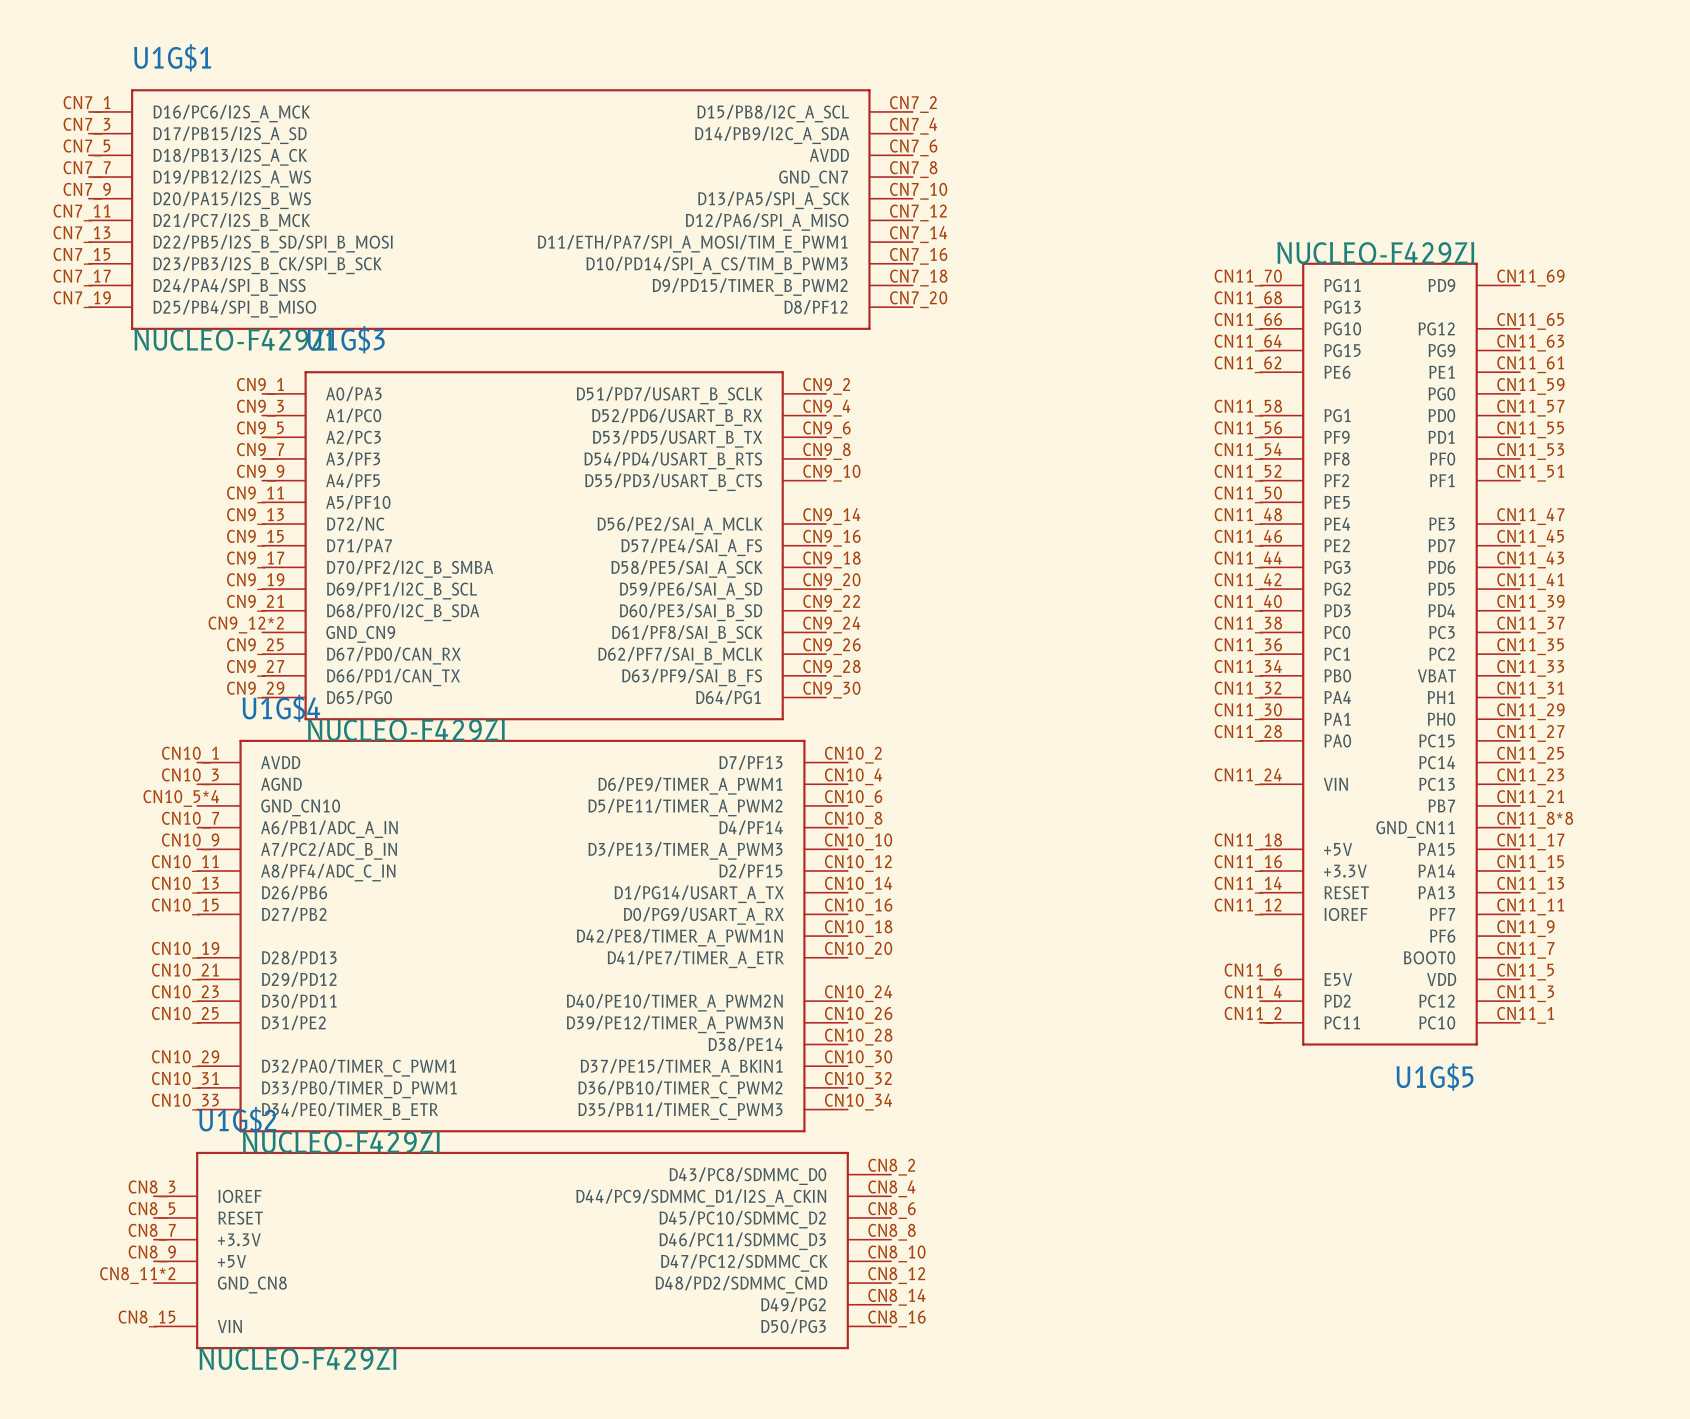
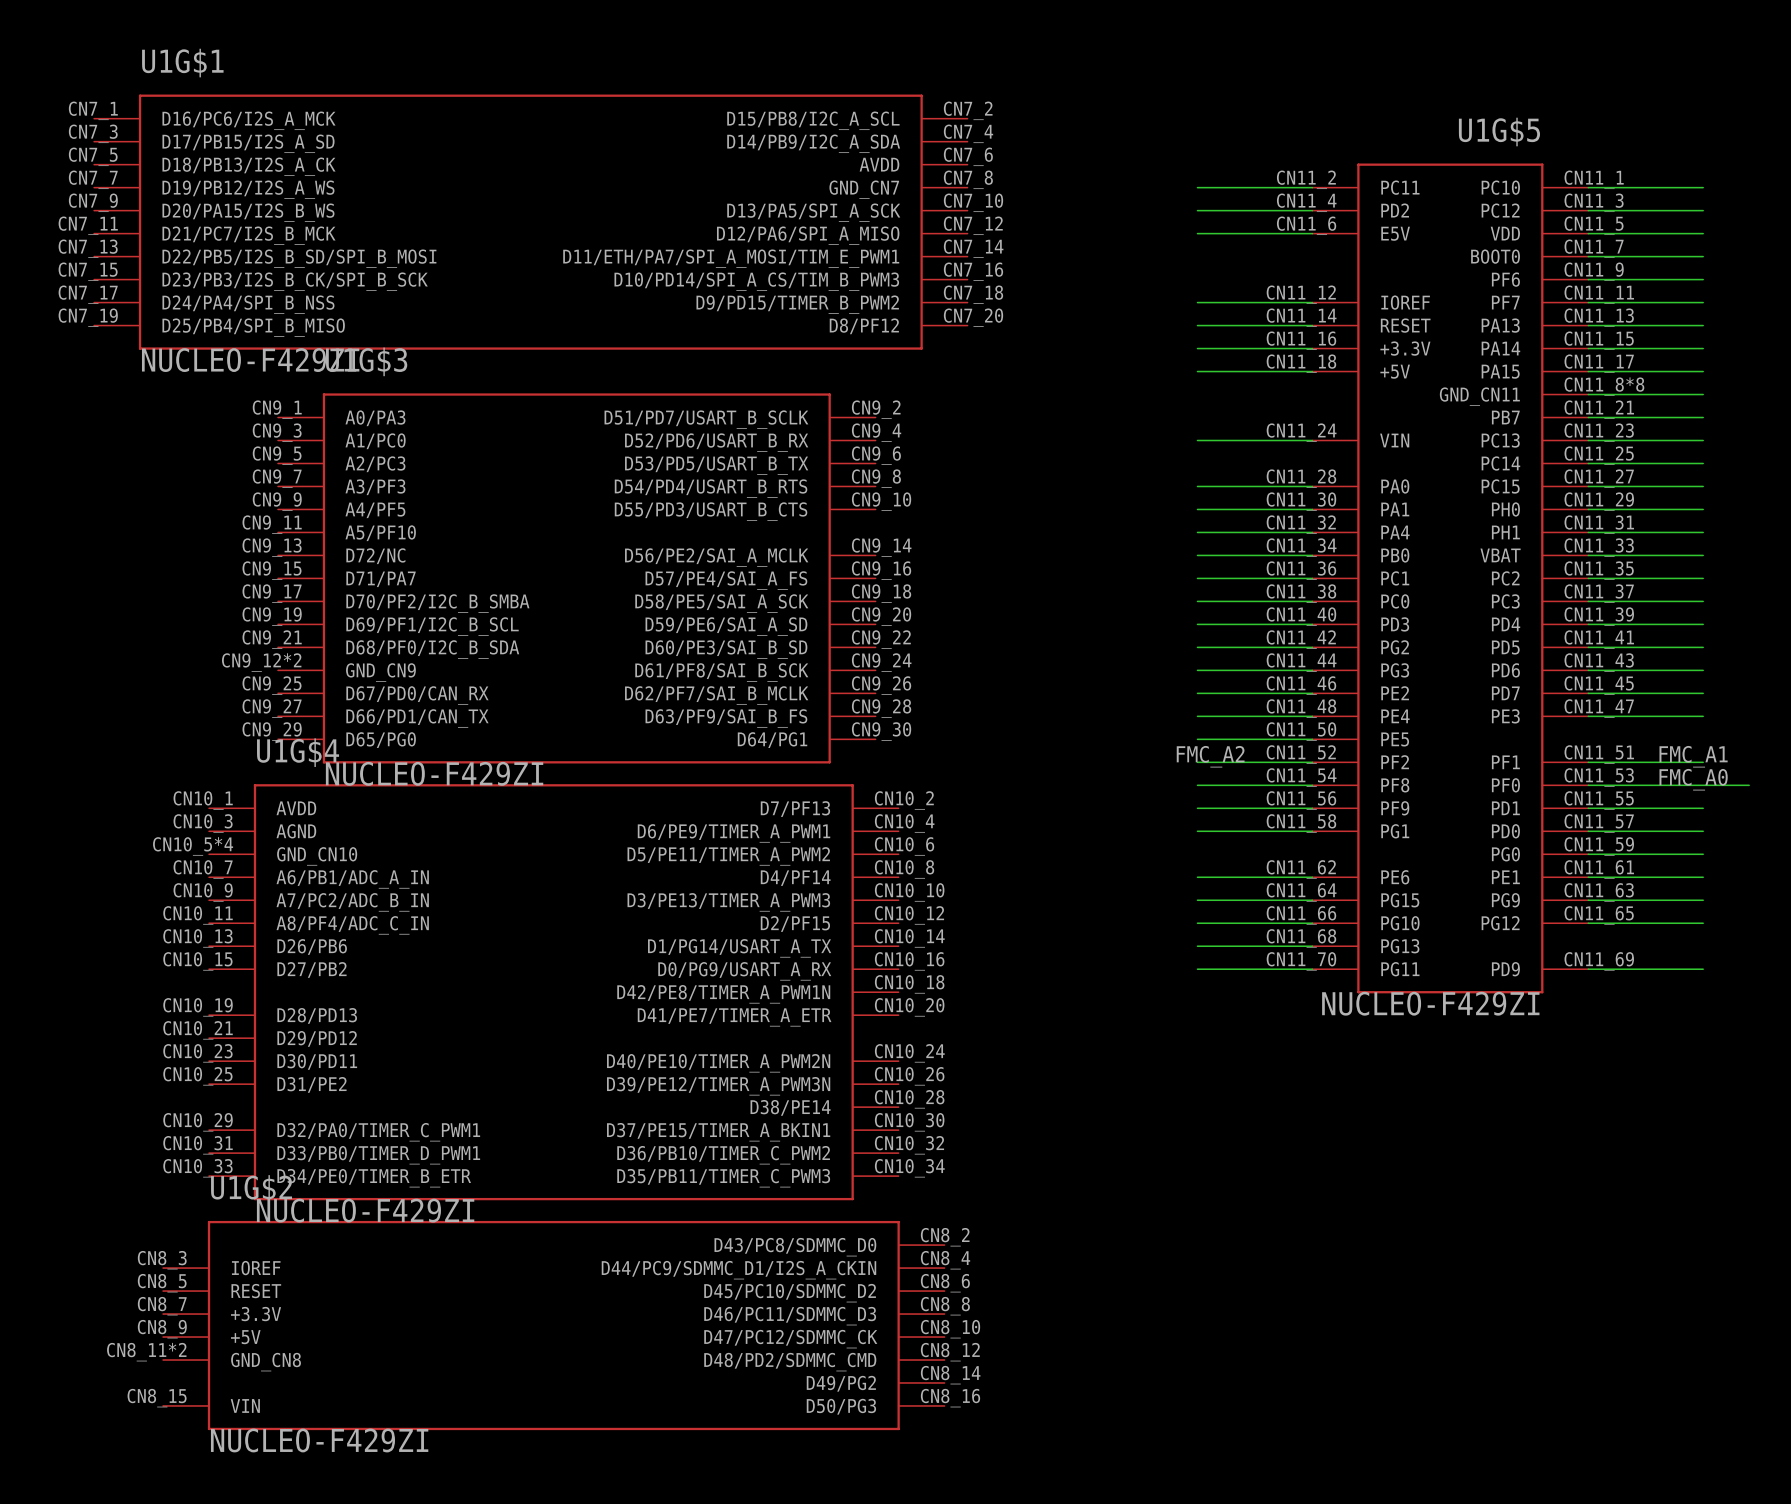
wire: none -> (1197, 187) (1312, 187)
wire: none -> (1588, 187) (1703, 187)
wire: none -> (1197, 210) (1312, 210)
wire: none -> (1588, 210) (1703, 210)
wire: none -> (1197, 233) (1312, 233)
wire: none -> (1588, 233) (1703, 233)
wire: none -> (1588, 256) (1703, 256)
wire: none -> (1588, 279) (1703, 279)
wire: none -> (1197, 302) (1312, 302)
wire: none -> (1588, 302) (1703, 302)
wire: none -> (1197, 325) (1312, 325)
wire: none -> (1588, 325) (1703, 325)
wire: none -> (1197, 348) (1312, 348)
wire: none -> (1588, 348) (1703, 348)
wire: none -> (1197, 371) (1312, 371)
wire: none -> (1588, 371) (1703, 371)
wire: none -> (1588, 394) (1703, 394)
wire: none -> (1588, 417) (1703, 417)
wire: none -> (1197, 440) (1312, 440)
wire: none -> (1588, 440) (1703, 440)
wire: none -> (1588, 463) (1703, 463)
wire: none -> (1197, 486) (1312, 486)
wire: none -> (1588, 486) (1703, 486)
wire: none -> (1197, 509) (1312, 509)
wire: none -> (1588, 509) (1703, 509)
wire: none -> (1197, 532) (1312, 532)
wire: none -> (1588, 532) (1703, 532)
wire: none -> (1197, 555) (1312, 555)
wire: none -> (1588, 555) (1703, 555)
wire: none -> (1197, 578) (1312, 578)
wire: none -> (1588, 578) (1703, 578)
wire: none -> (1197, 601) (1312, 601)
wire: none -> (1588, 601) (1703, 601)
wire: none -> (1197, 624) (1312, 624)
wire: none -> (1588, 624) (1703, 624)
wire: none -> (1197, 647) (1312, 647)
wire: none -> (1588, 647) (1703, 647)
wire: none -> (1197, 670) (1312, 670)
wire: none -> (1588, 670) (1703, 670)
wire: none -> (1197, 693) (1312, 693)
U1G$5 flip: as is (1389, 654) -> up-down (1450, 578)
wire: none -> (1588, 693) (1703, 693)
wire: none -> (1197, 716) (1312, 716)
wire: none -> (1588, 716) (1703, 716)
wire: none -> (1197, 739) (1312, 739)
label: none -> FMC_A2 (1210, 756)
label: none -> FMC_A1 (1693, 756)
wire: none -> (1197, 762) (1312, 762)
wire: none -> (1588, 762) (1703, 762)
label: none -> FMC_A0 (1693, 779)
wire: none -> (1197, 785) (1312, 785)
wire: none -> (1588, 785) (1749, 785)
wire: none -> (1197, 808) (1312, 808)
wire: none -> (1588, 808) (1703, 808)
wire: none -> (1197, 831) (1312, 831)
wire: none -> (1588, 831) (1703, 831)
wire: none -> (1588, 854) (1703, 854)
wire: none -> (1197, 877) (1312, 877)
wire: none -> (1588, 877) (1703, 877)
wire: none -> (1197, 900) (1312, 900)
wire: none -> (1588, 900) (1703, 900)
wire: none -> (1197, 923) (1312, 923)
wire: none -> (1588, 923) (1703, 923)
wire: none -> (1197, 946) (1312, 946)
wire: none -> (1197, 969) (1312, 969)
wire: none -> (1588, 969) (1703, 969)

